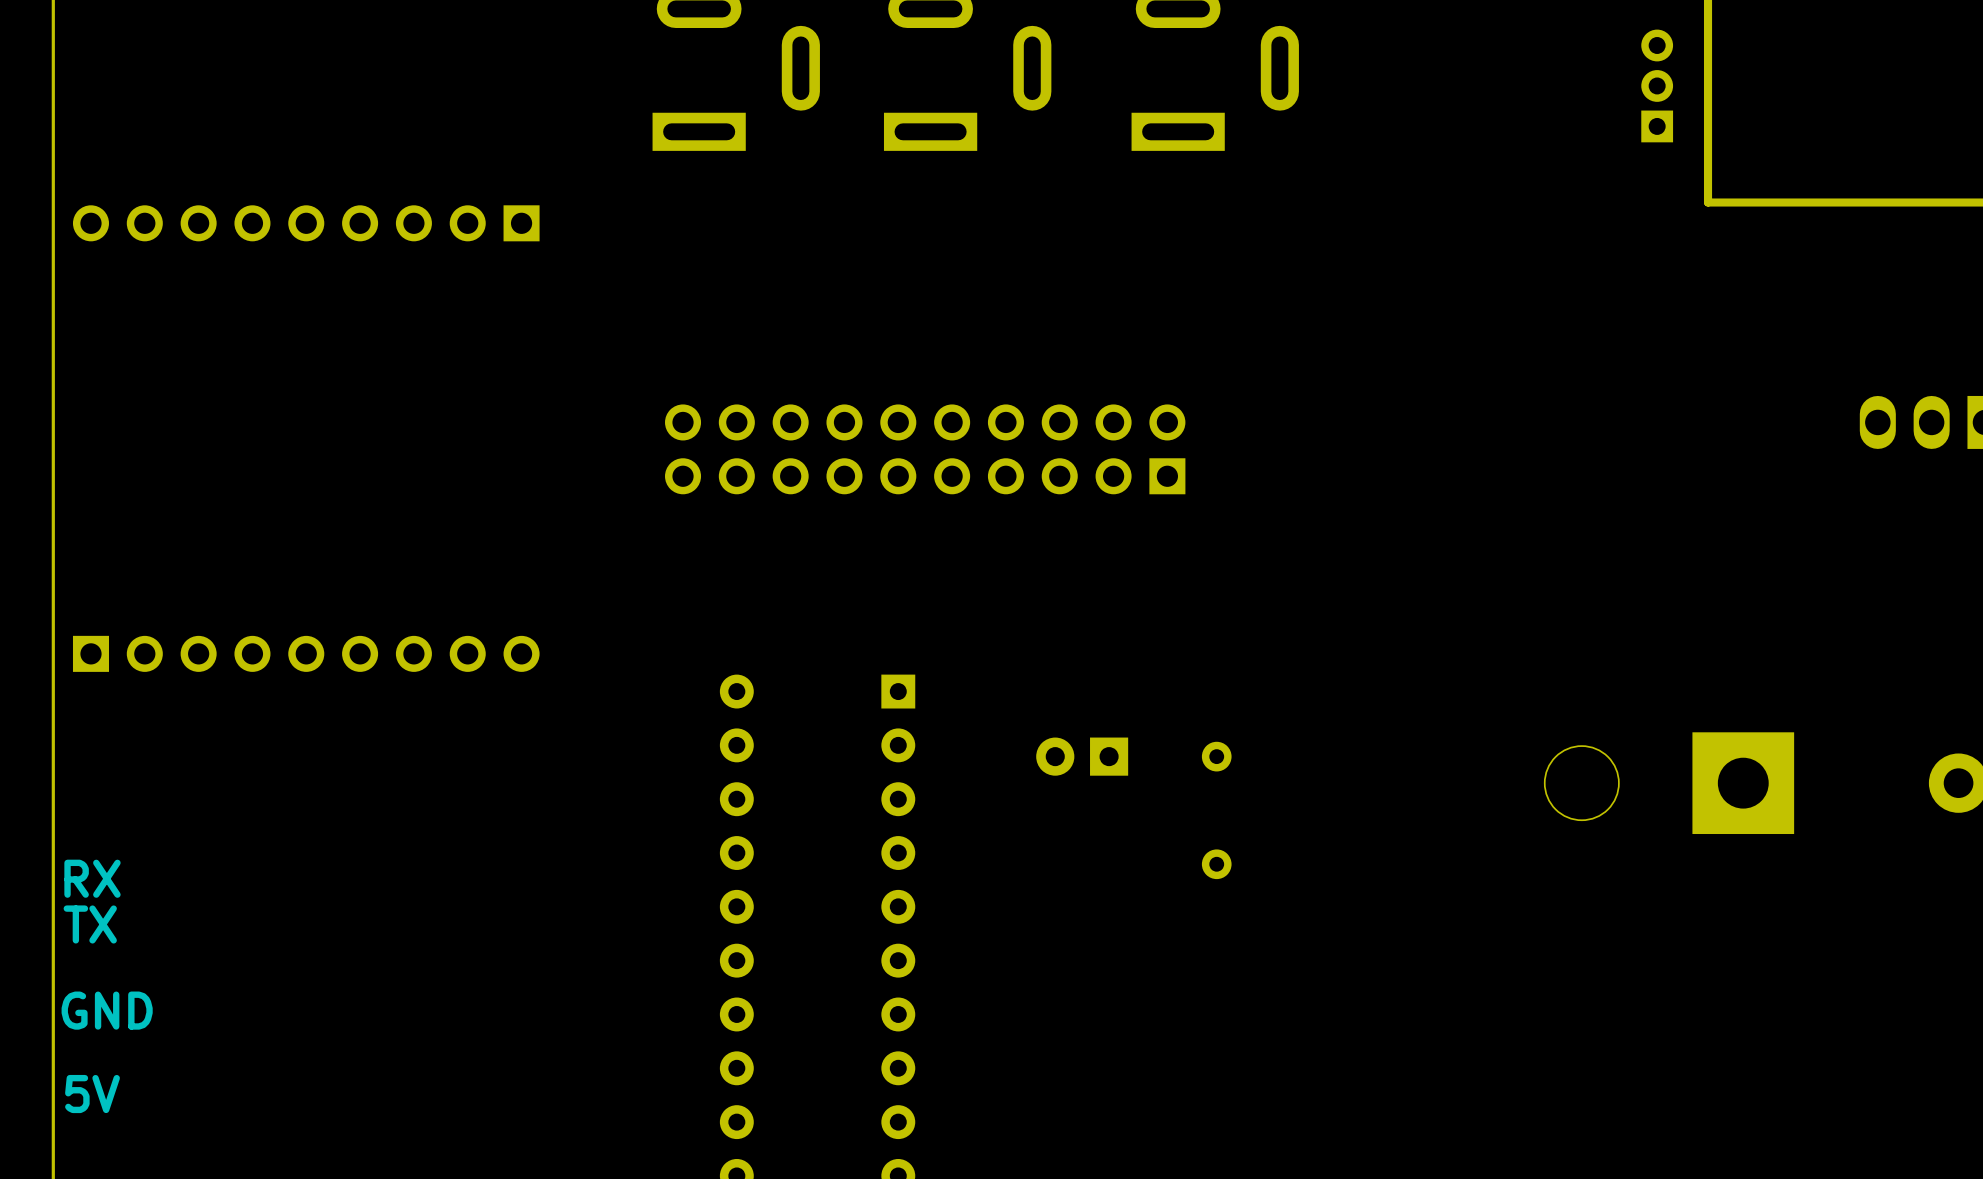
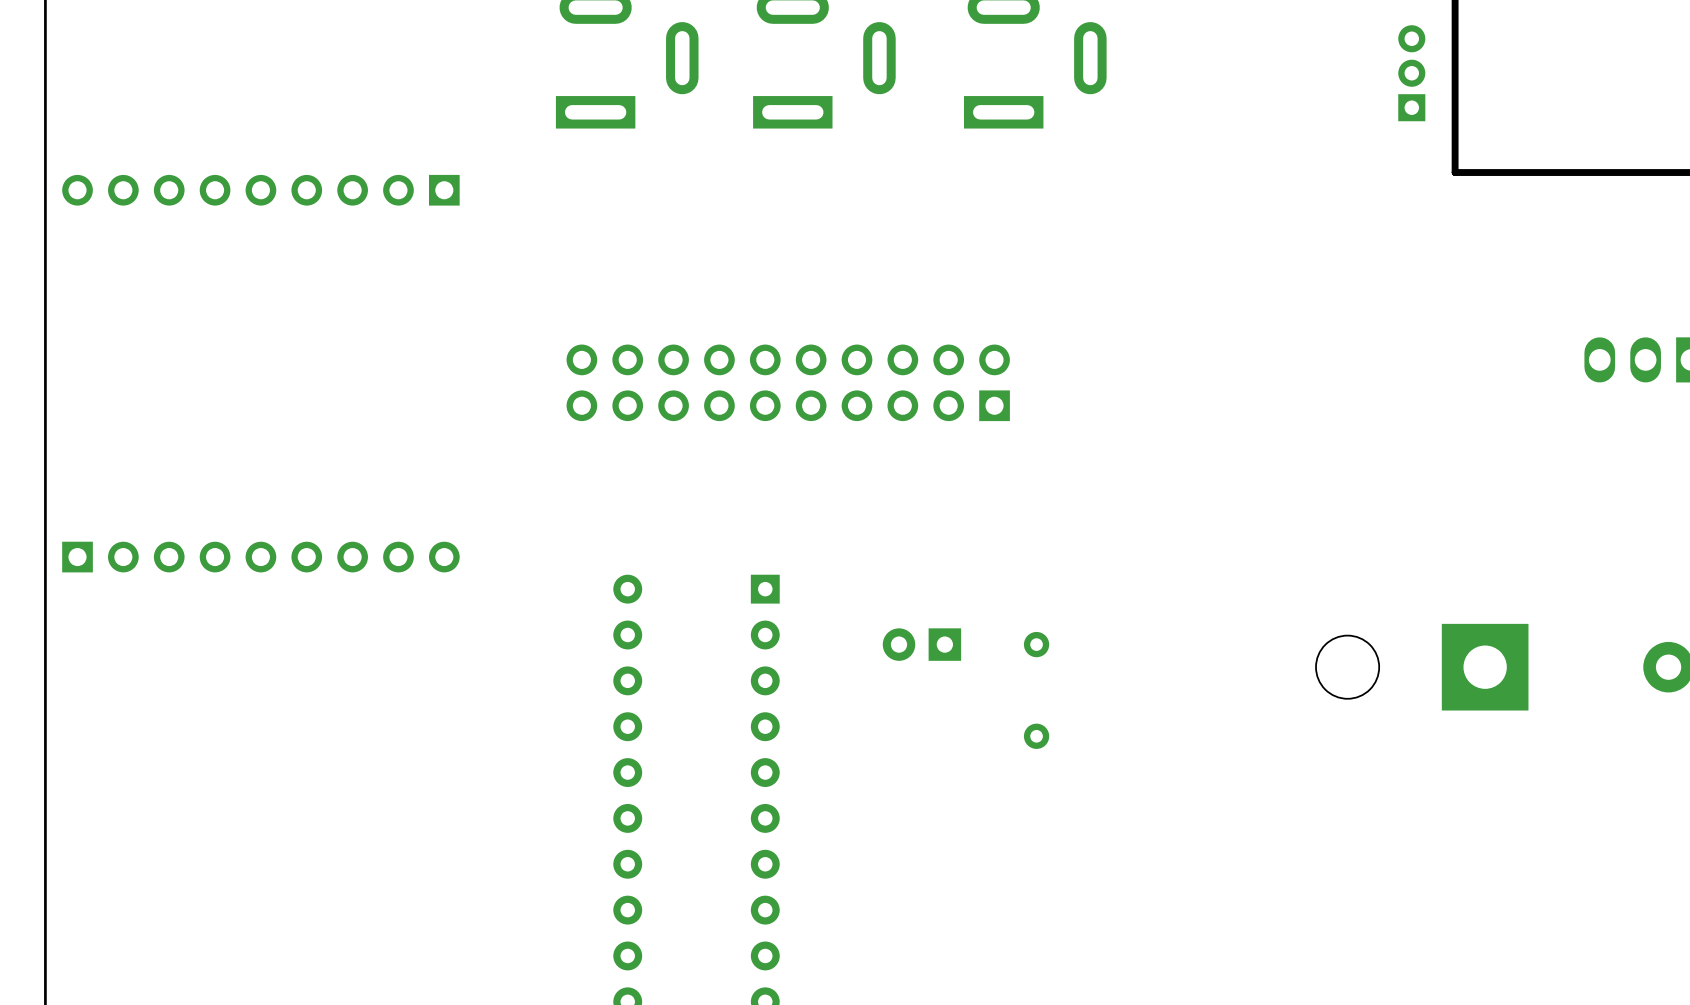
text: RX (92, 878) -> none
text: TX (90, 924) -> none
text: GND (107, 1010) -> none
text: 5V (92, 1094) -> none

